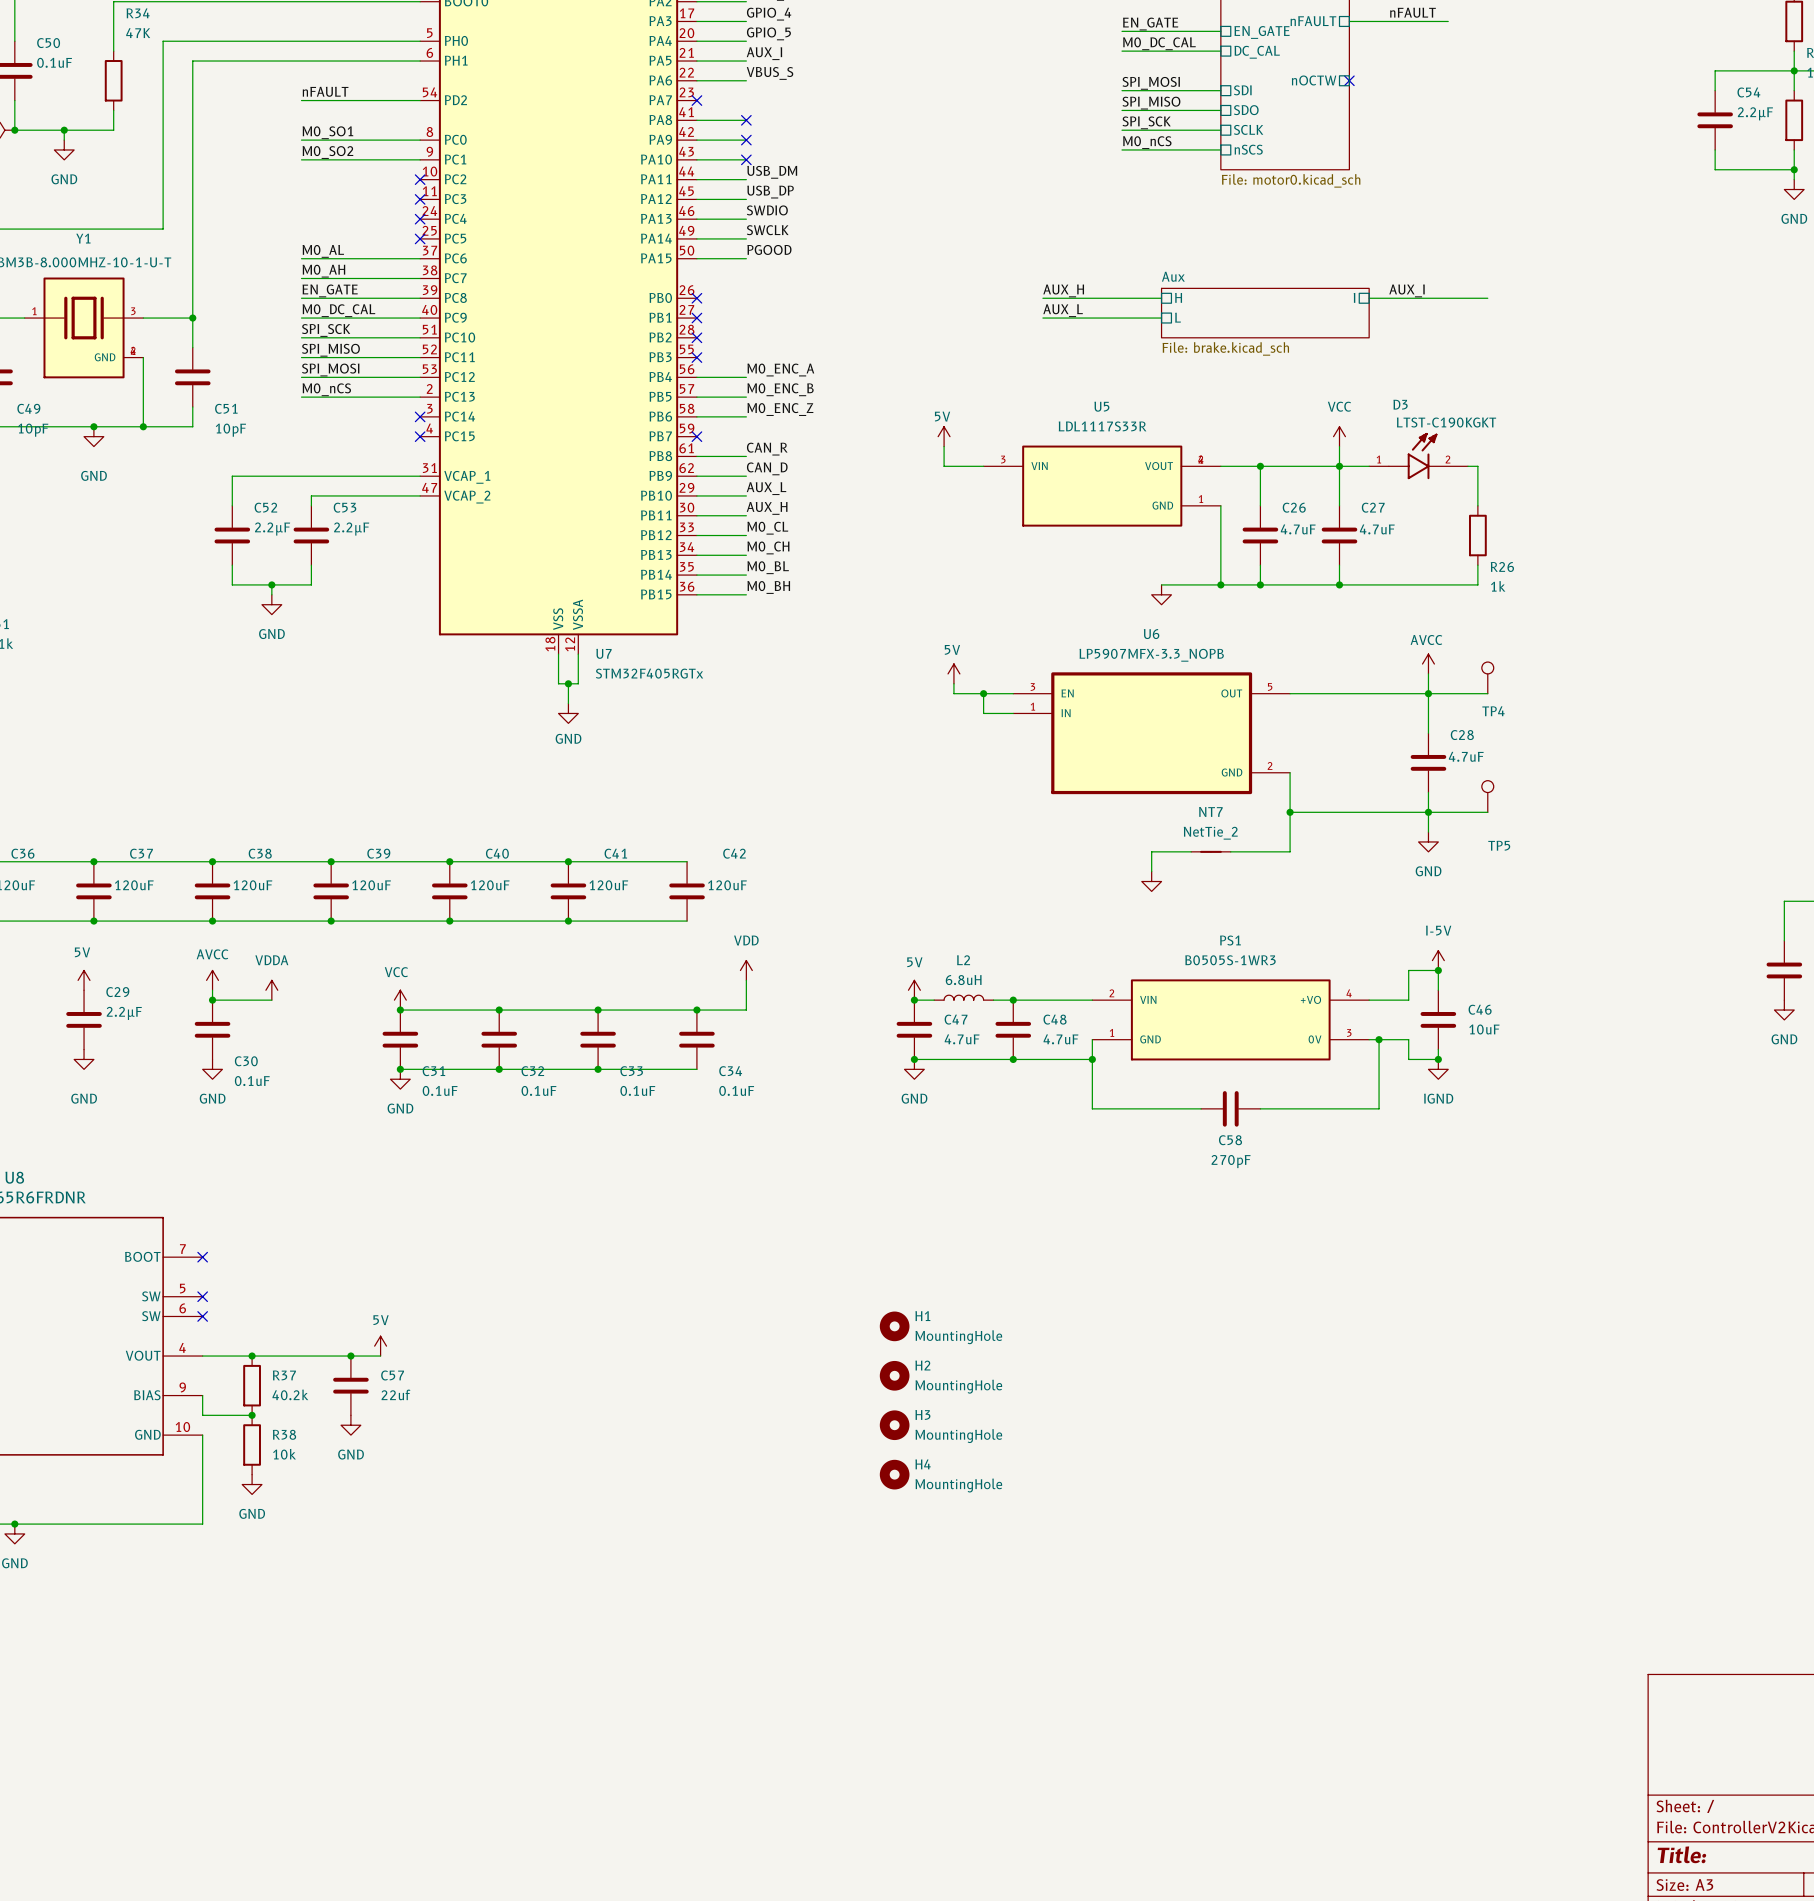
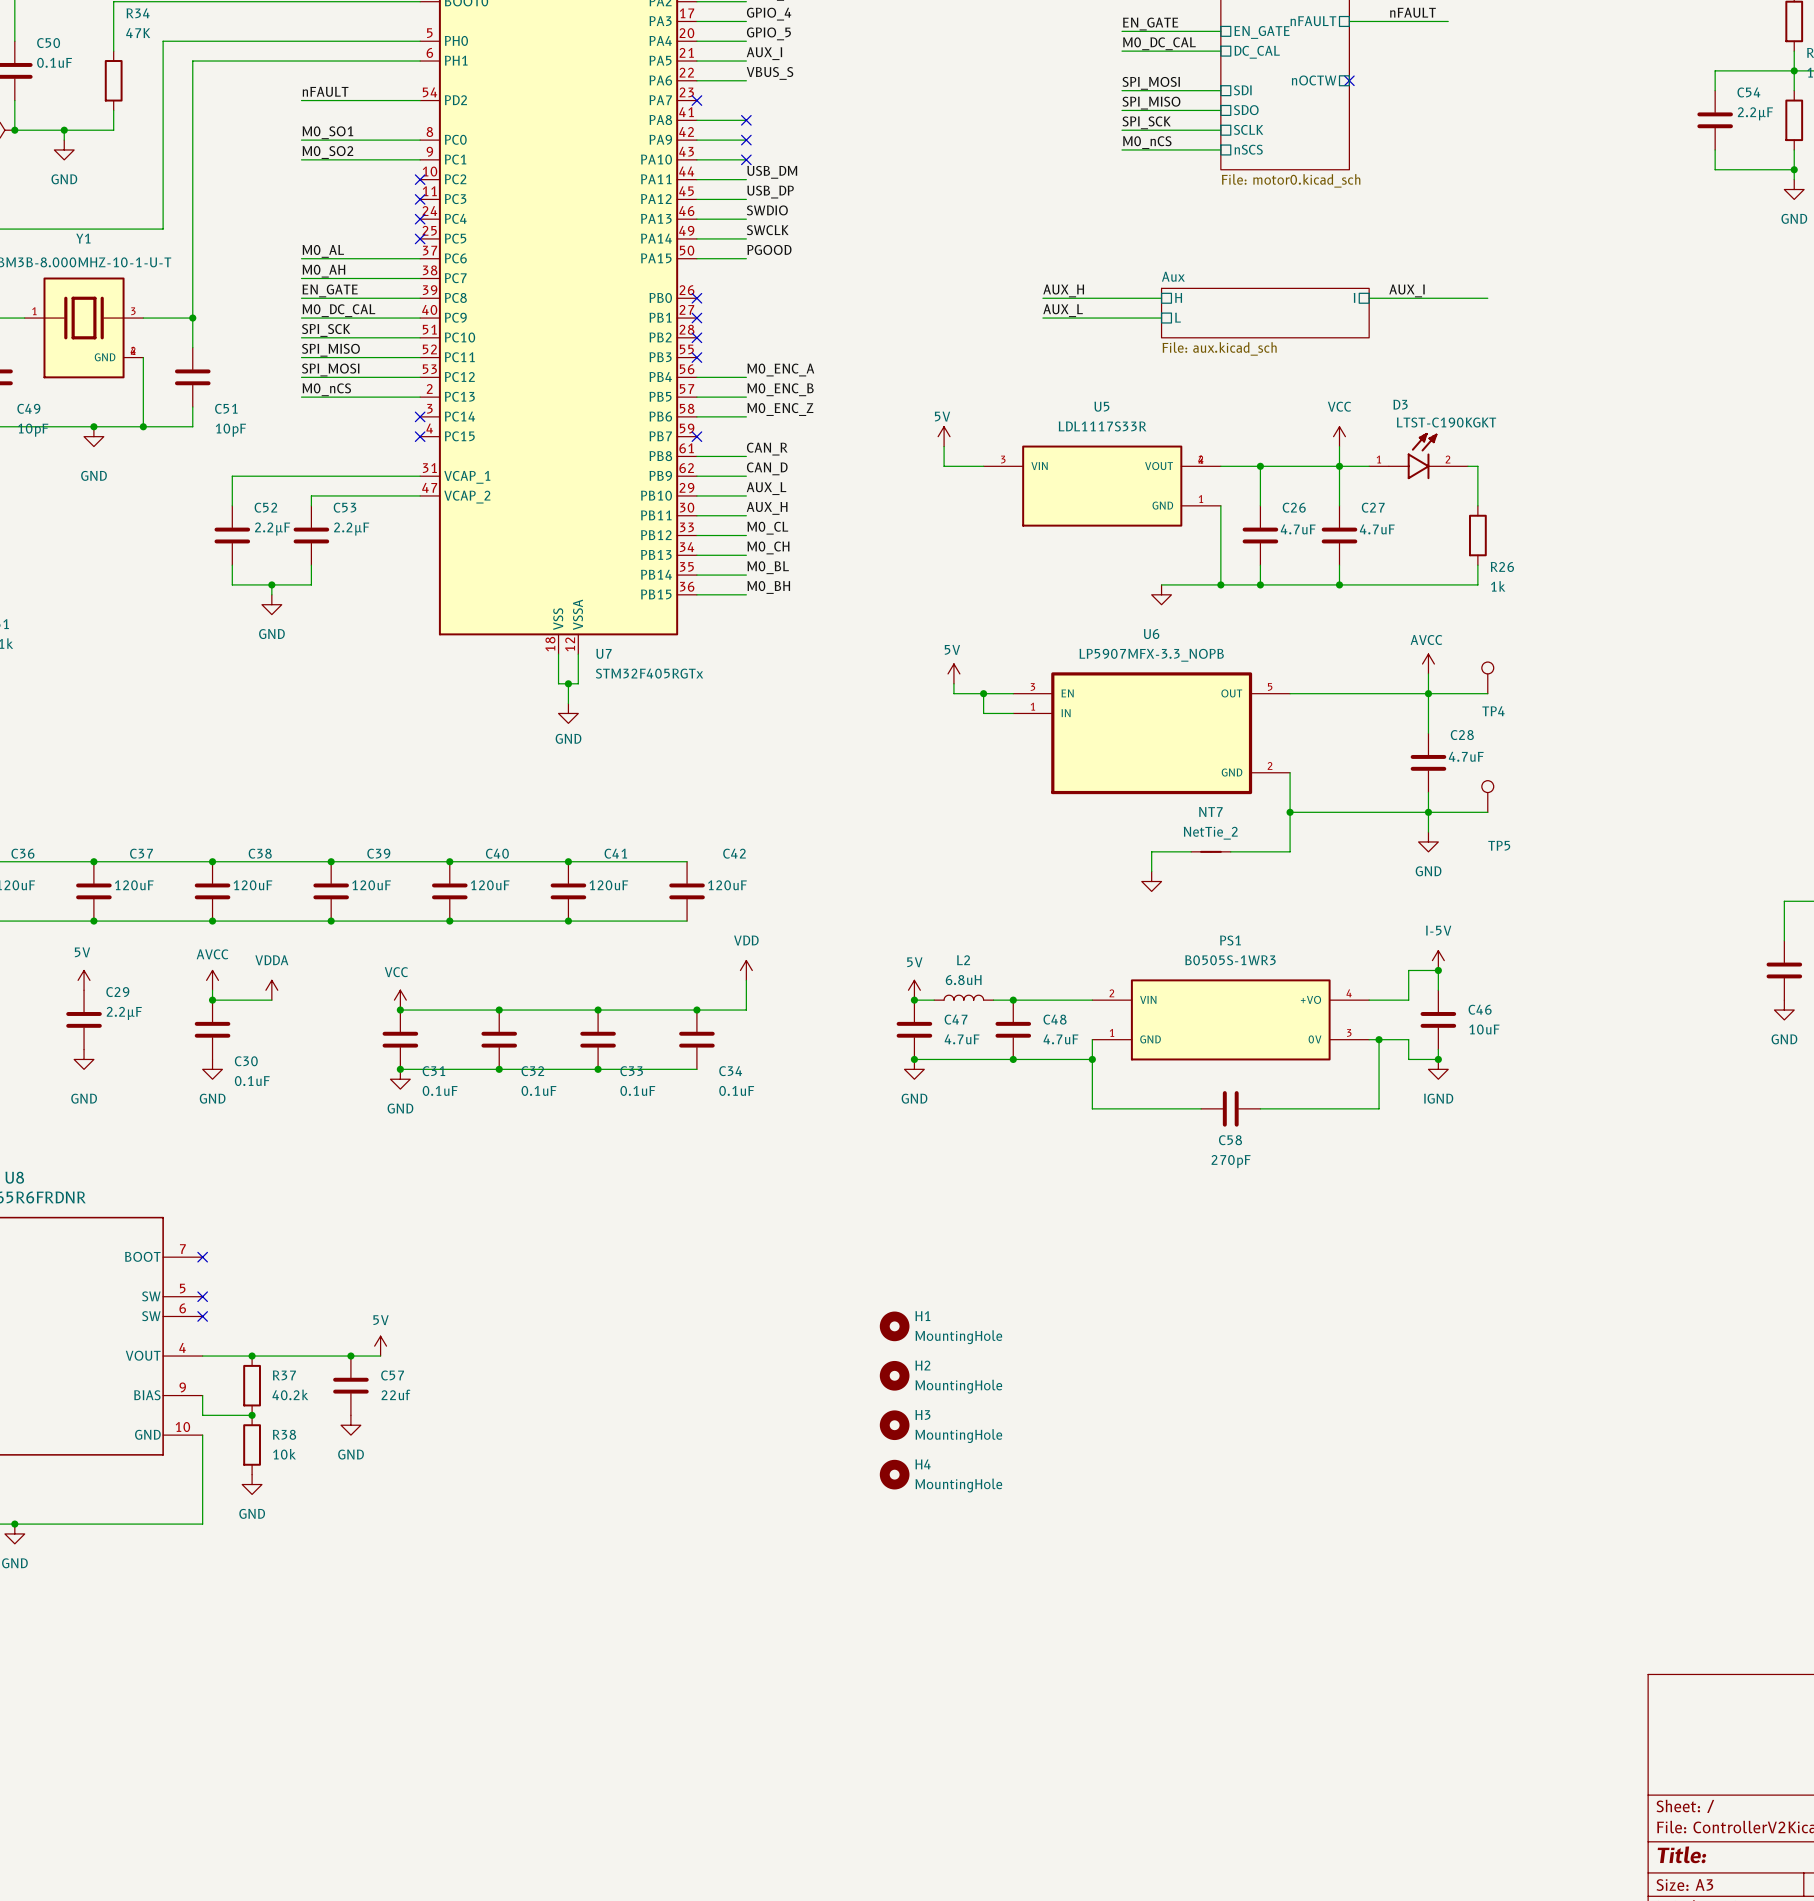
sheet Aux value: File: brake.kicad_sch (1225, 348) -> File: aux.kicad_sch (1219, 348)

